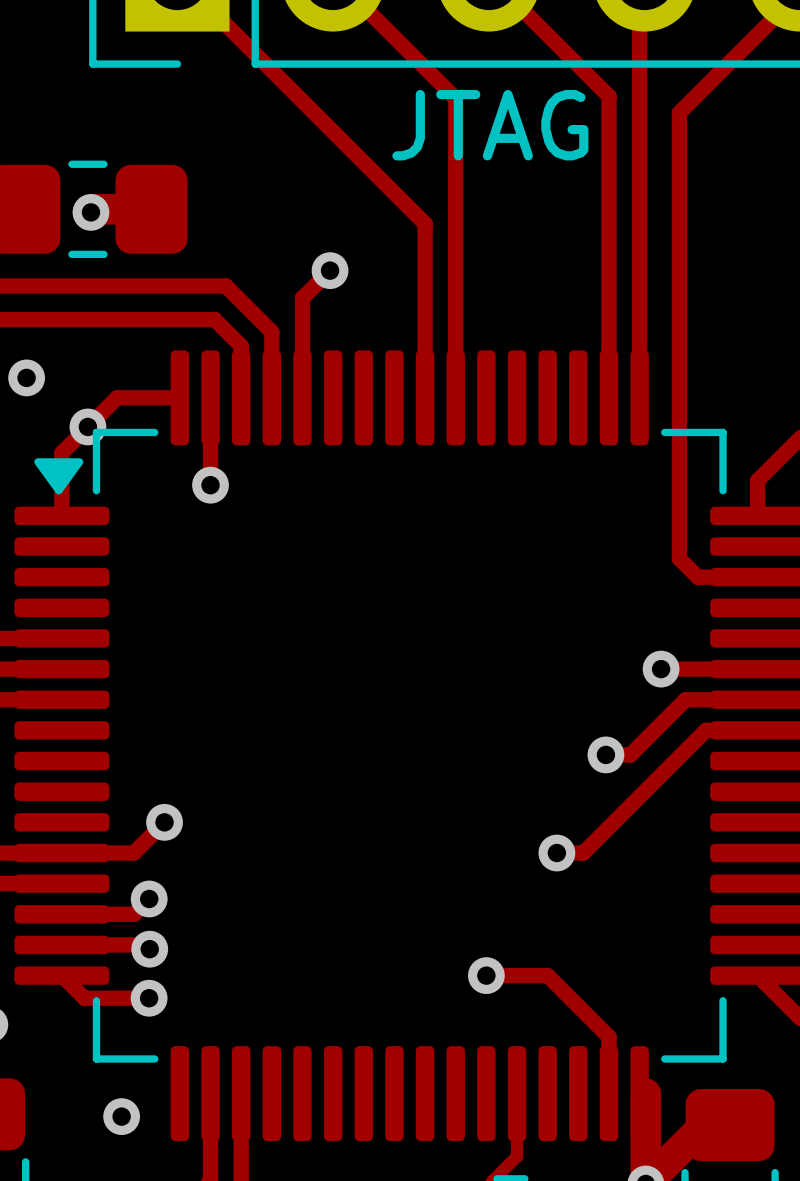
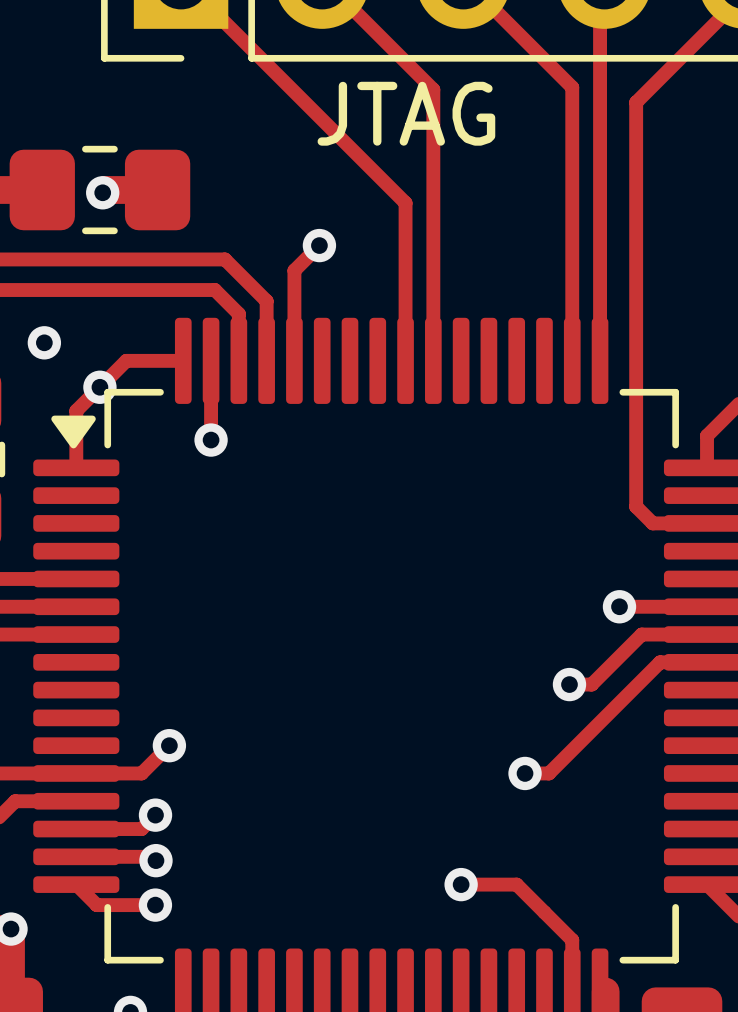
text position: JTAG (490, 125) -> JTAG (406, 113)

